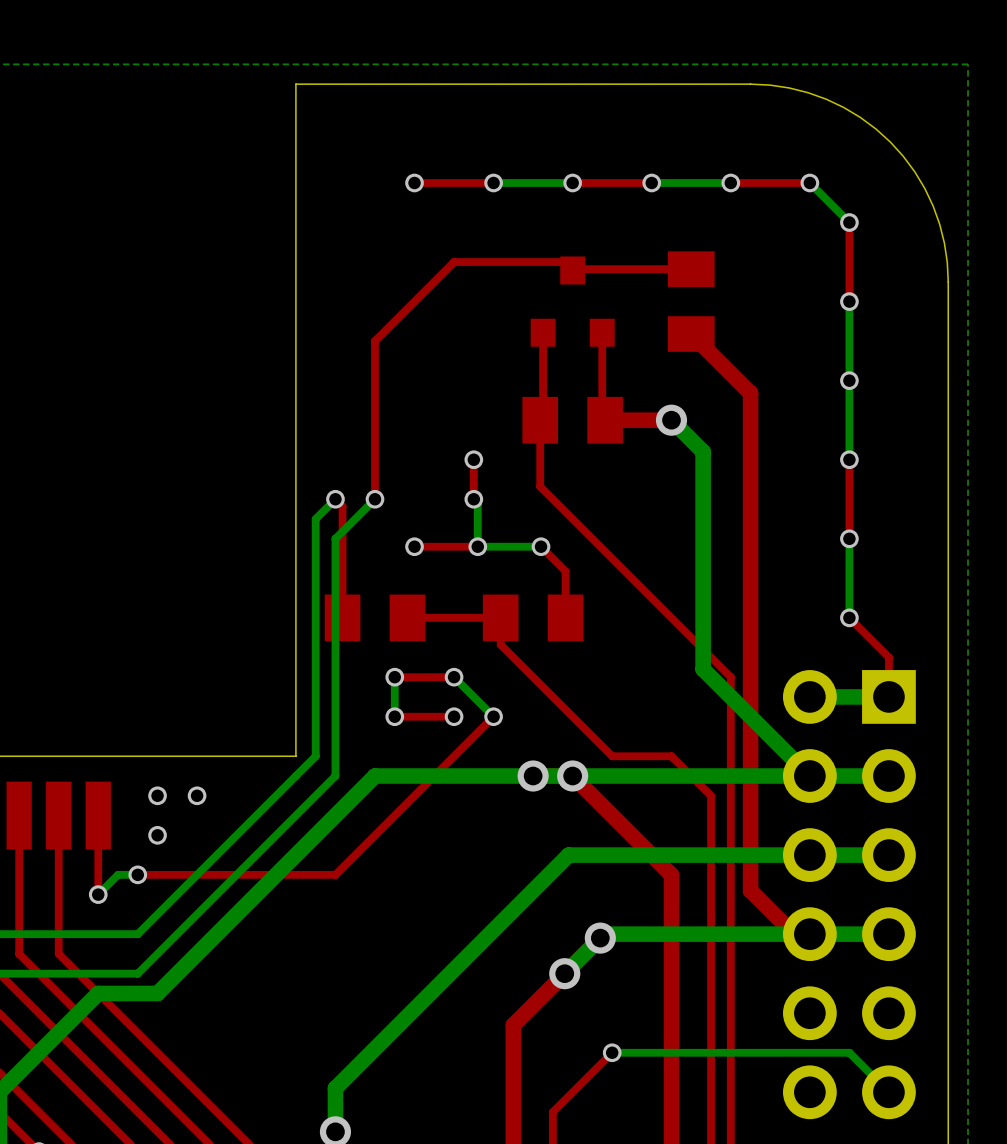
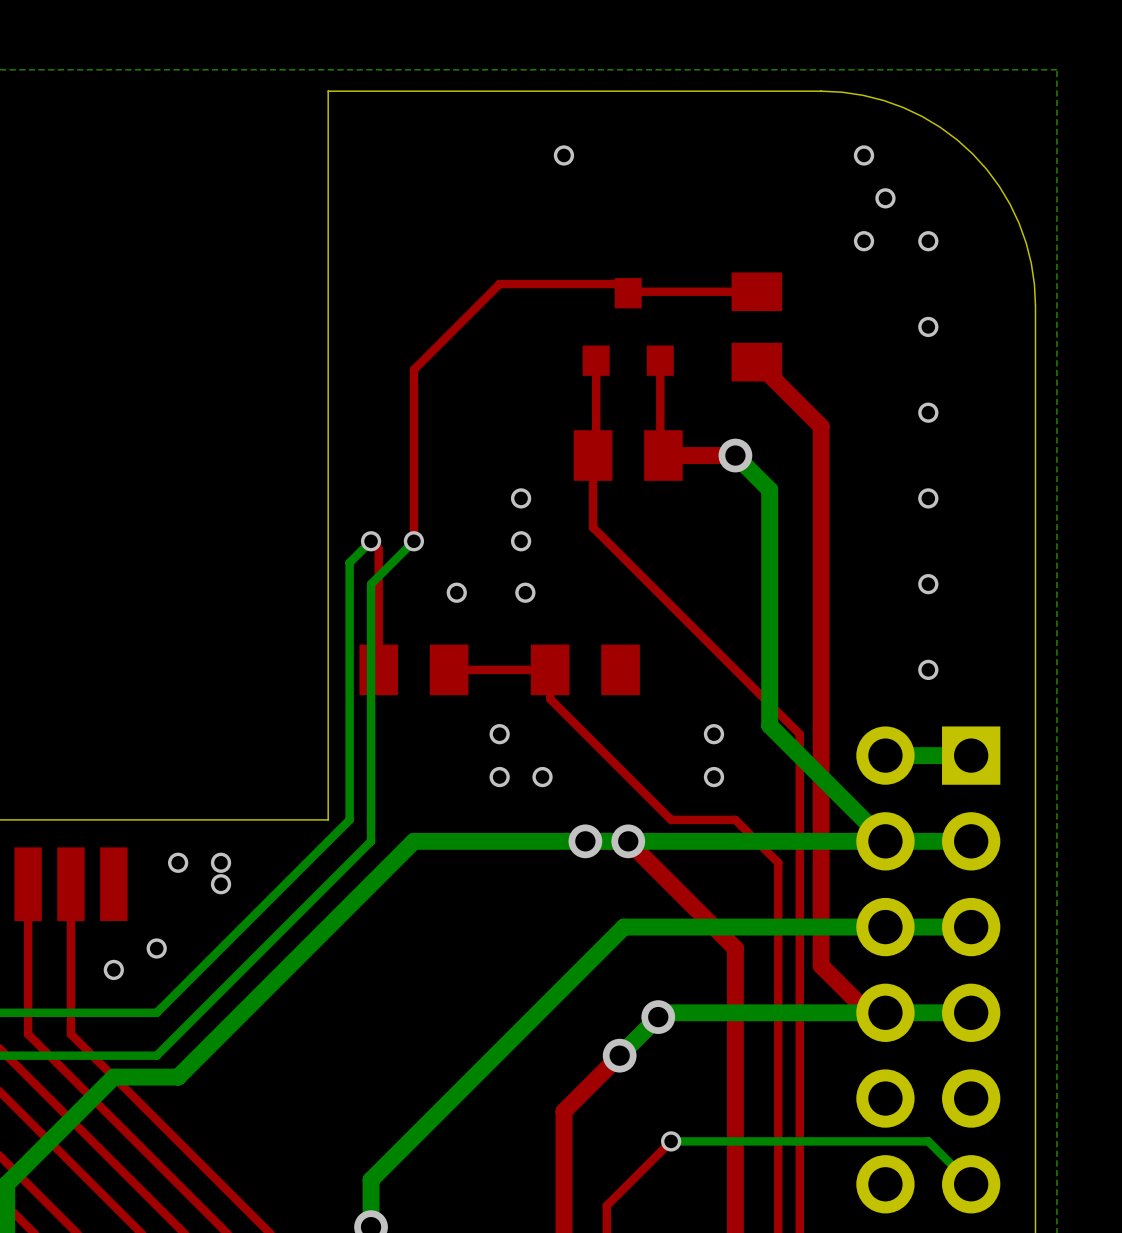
via: none -> (563, 155)
via: none -> (864, 155)
via: (414, 182) -> none
top track: (493, 182) (414, 182) -> none
via: (493, 182) -> none
bottom track: (572, 182) (493, 182) -> none
via: (572, 182) -> none
top track: (651, 182) (572, 182) -> none
via: (651, 182) -> none
bottom track: (730, 182) (651, 182) -> none
via: (730, 182) -> none
top track: (809, 182) (730, 182) -> none
bottom track: (809, 182) (849, 222) -> none
via: none -> (864, 241)
top track: (849, 222) (849, 301) -> none
bottom track: (849, 301) (849, 459) -> none
top track: (473, 459) (473, 499) -> none
top track: (849, 459) (849, 538) -> none
bottom track: (473, 499) (477, 503) (477, 546) (541, 546) -> none
bottom track: (849, 538) (849, 617) -> none
top track: (477, 546) (414, 546) -> none
top track: (541, 546) (565, 571) (565, 617) -> none
via: (541, 546) -> none
top track: (849, 617) (888, 657) (888, 696) -> none
bottom track: (394, 677) (394, 716) -> none
via: (394, 677) -> none
top track: (454, 677) (394, 677) -> none
bottom track: (454, 677) (493, 716) -> none
via: none -> (713, 734)
via: (394, 716) -> none
top track: (454, 716) (394, 716) -> none
top track: (493, 716) (335, 874) (137, 874) -> none
via: none -> (713, 777)
top track: (98, 815) (98, 894) -> none
via position: (157, 835) -> (221, 884)
bottom track: (137, 874) (118, 874) (98, 894) -> none

